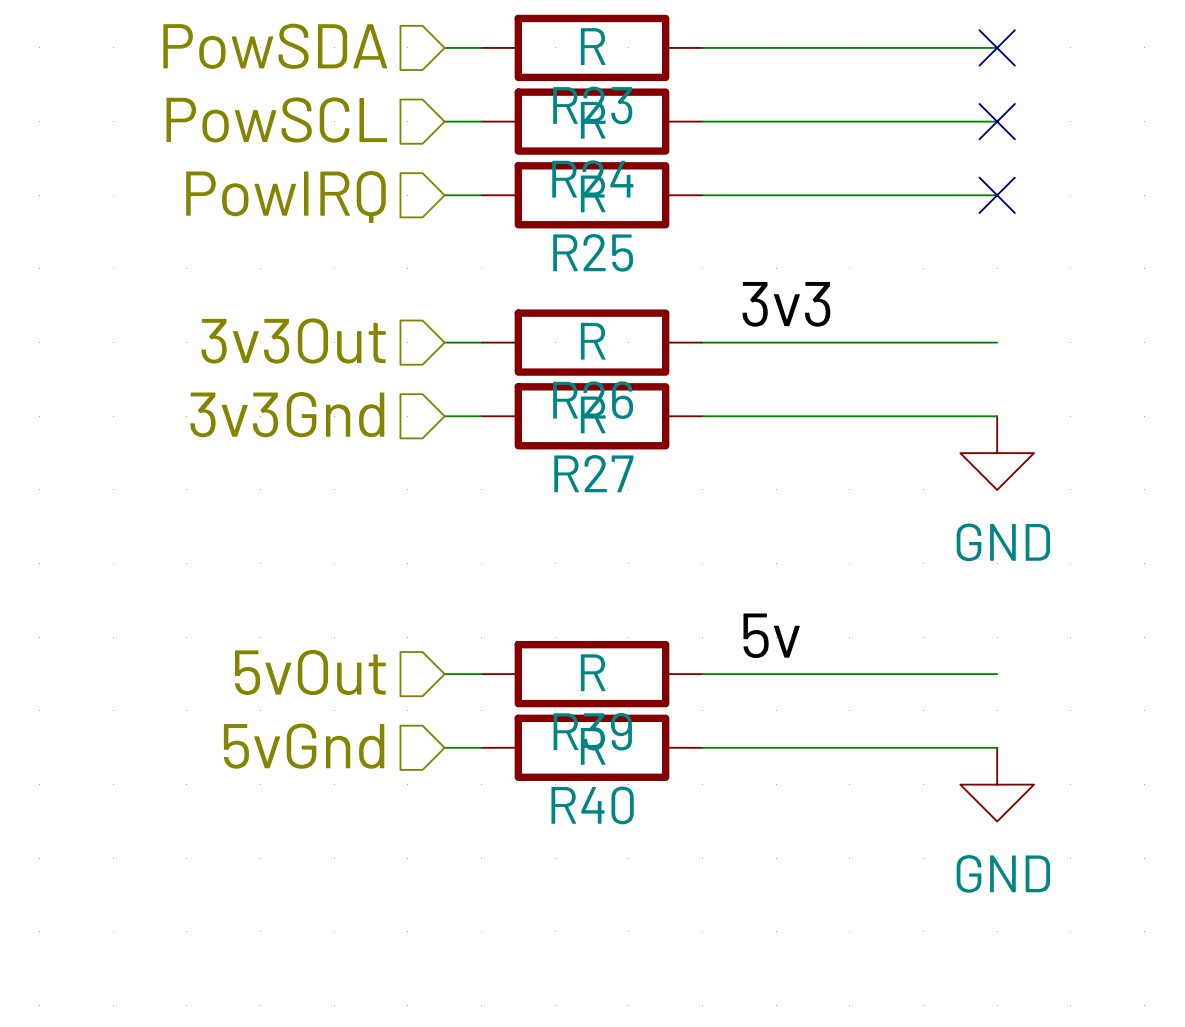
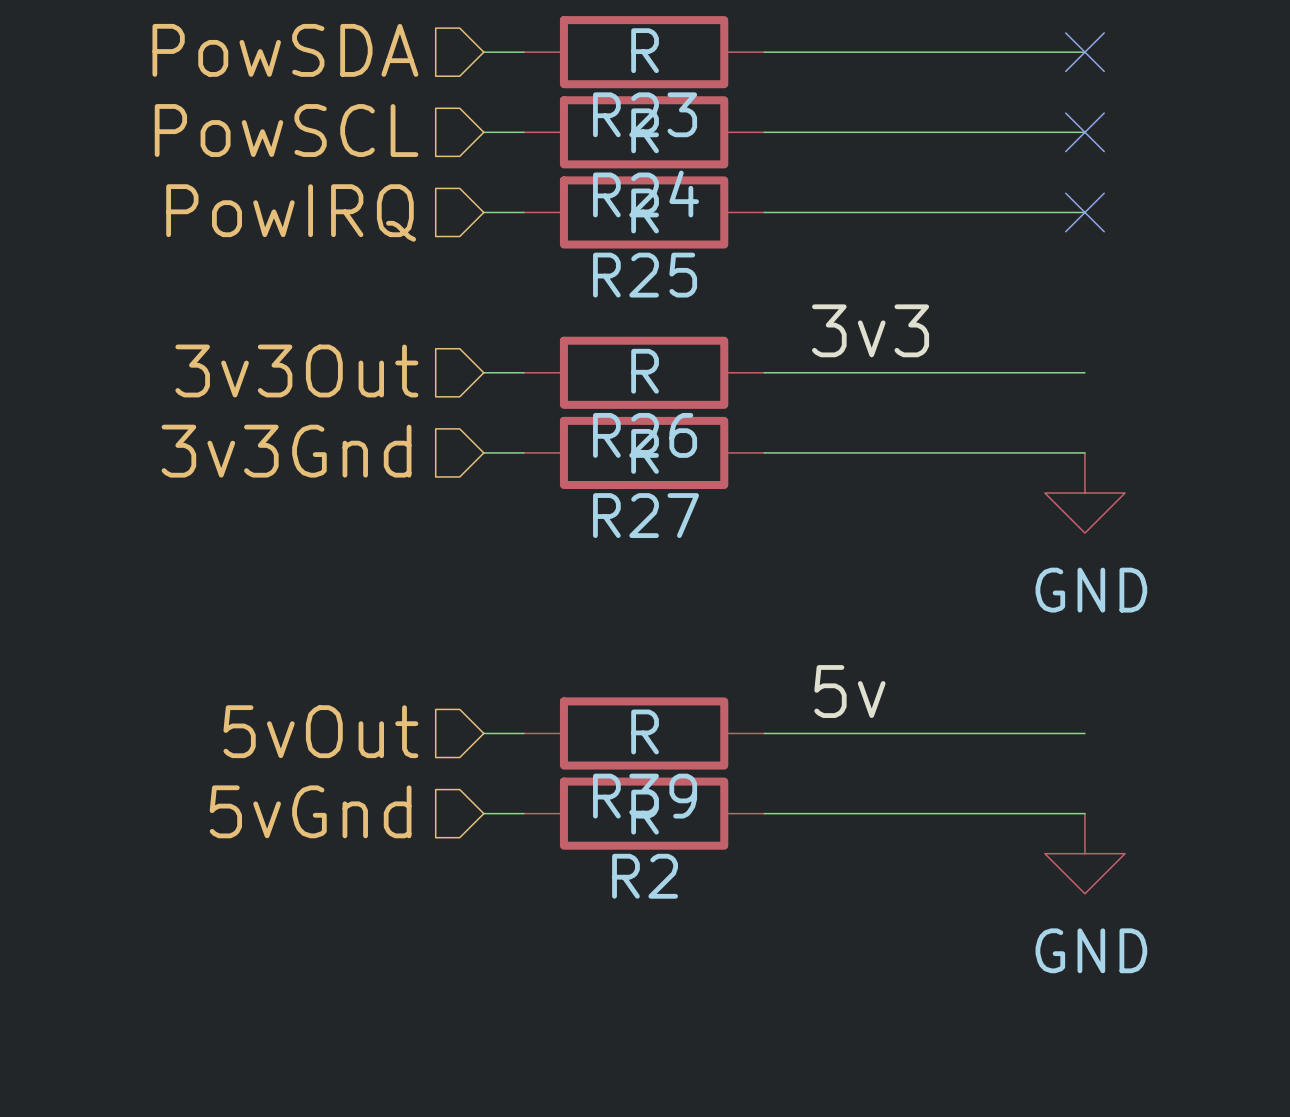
R40 name: R40 (592, 805) -> R2 (645, 876)

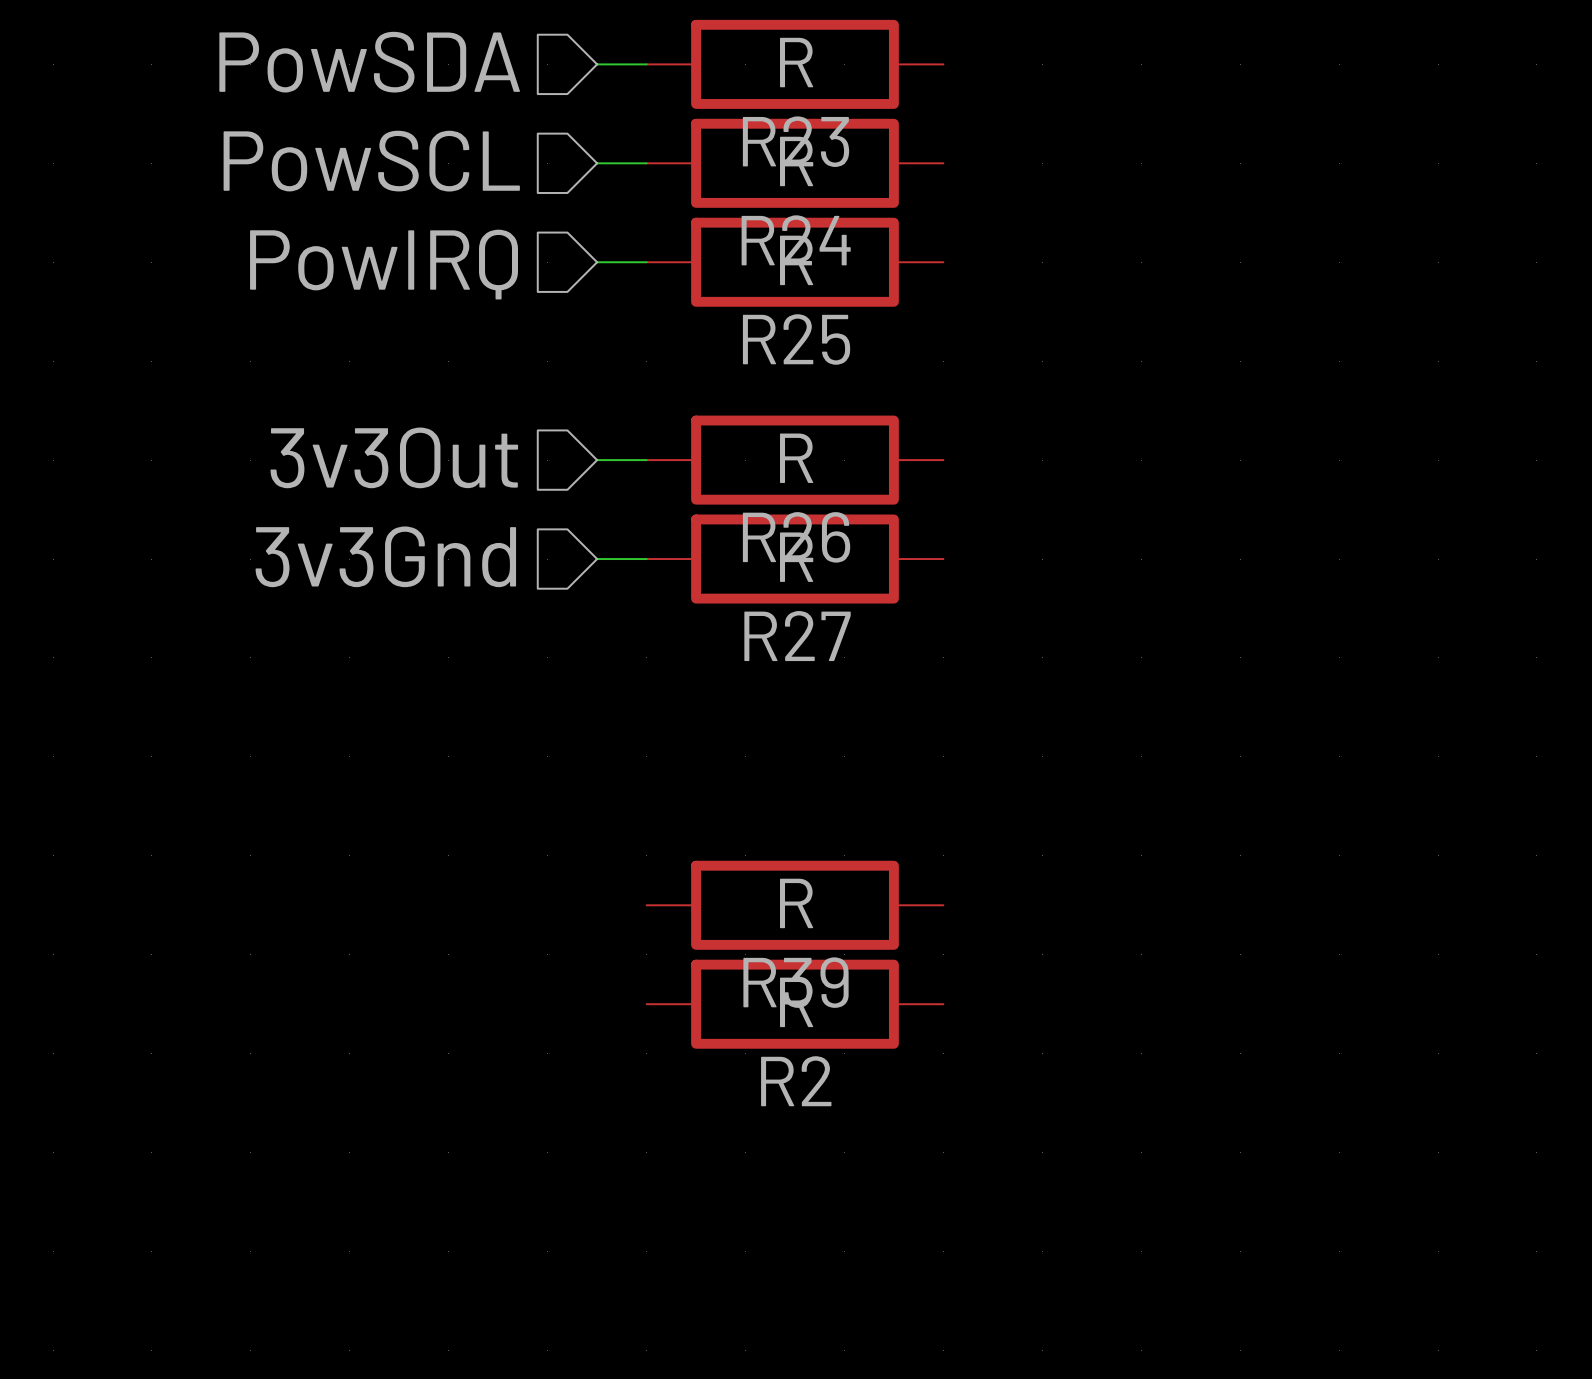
wire: (764, 52) (1084, 52) -> none
no-connect mark: (1084, 52) -> none
wire: (764, 132) (1084, 132) -> none
no-connect mark: (1084, 132) -> none
wire: (764, 212) (1084, 212) -> none
no-connect mark: (1084, 212) -> none
label: 3v3 (870, 330) -> none
wire: (764, 372) (1084, 372) -> none
wire: (764, 452) (1084, 452) -> none
power symbol: GND (1084, 493) -> none
label: 5v (849, 691) -> none
hierarchical label: 5vOut (320, 731) -> none
wire: (483, 733) (523, 733) -> none
wire: (764, 733) (1084, 733) -> none
hierarchical label: 5vGnd (310, 811) -> none
wire: (483, 813) (523, 813) -> none
wire: (764, 813) (1084, 813) -> none
power symbol: GND (1084, 853) -> none

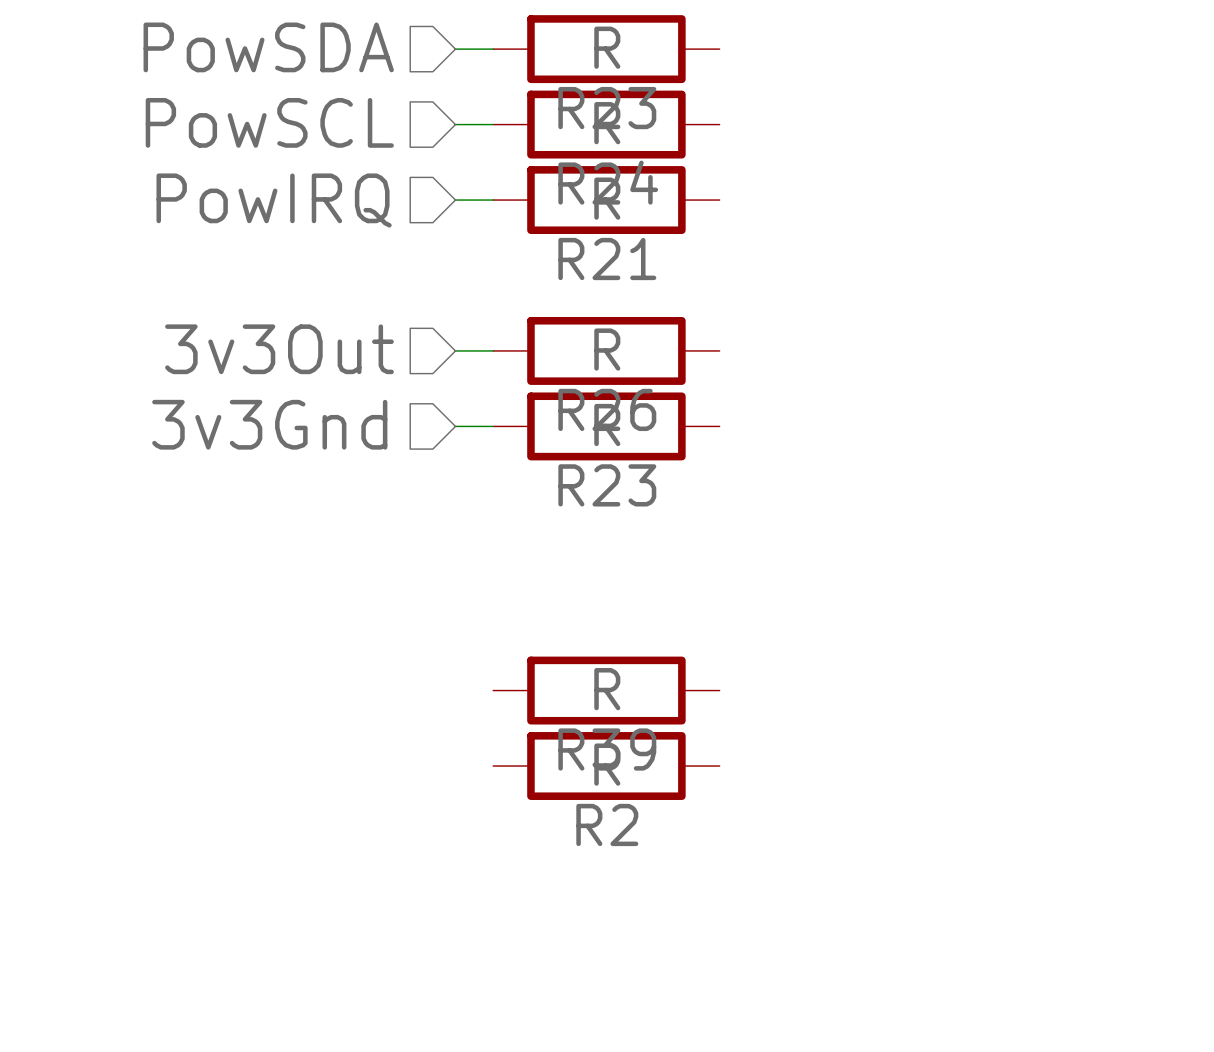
R25 name: R25 (796, 339) -> R21 (607, 259)
R27 name: R27 (797, 636) -> R23 (607, 485)

